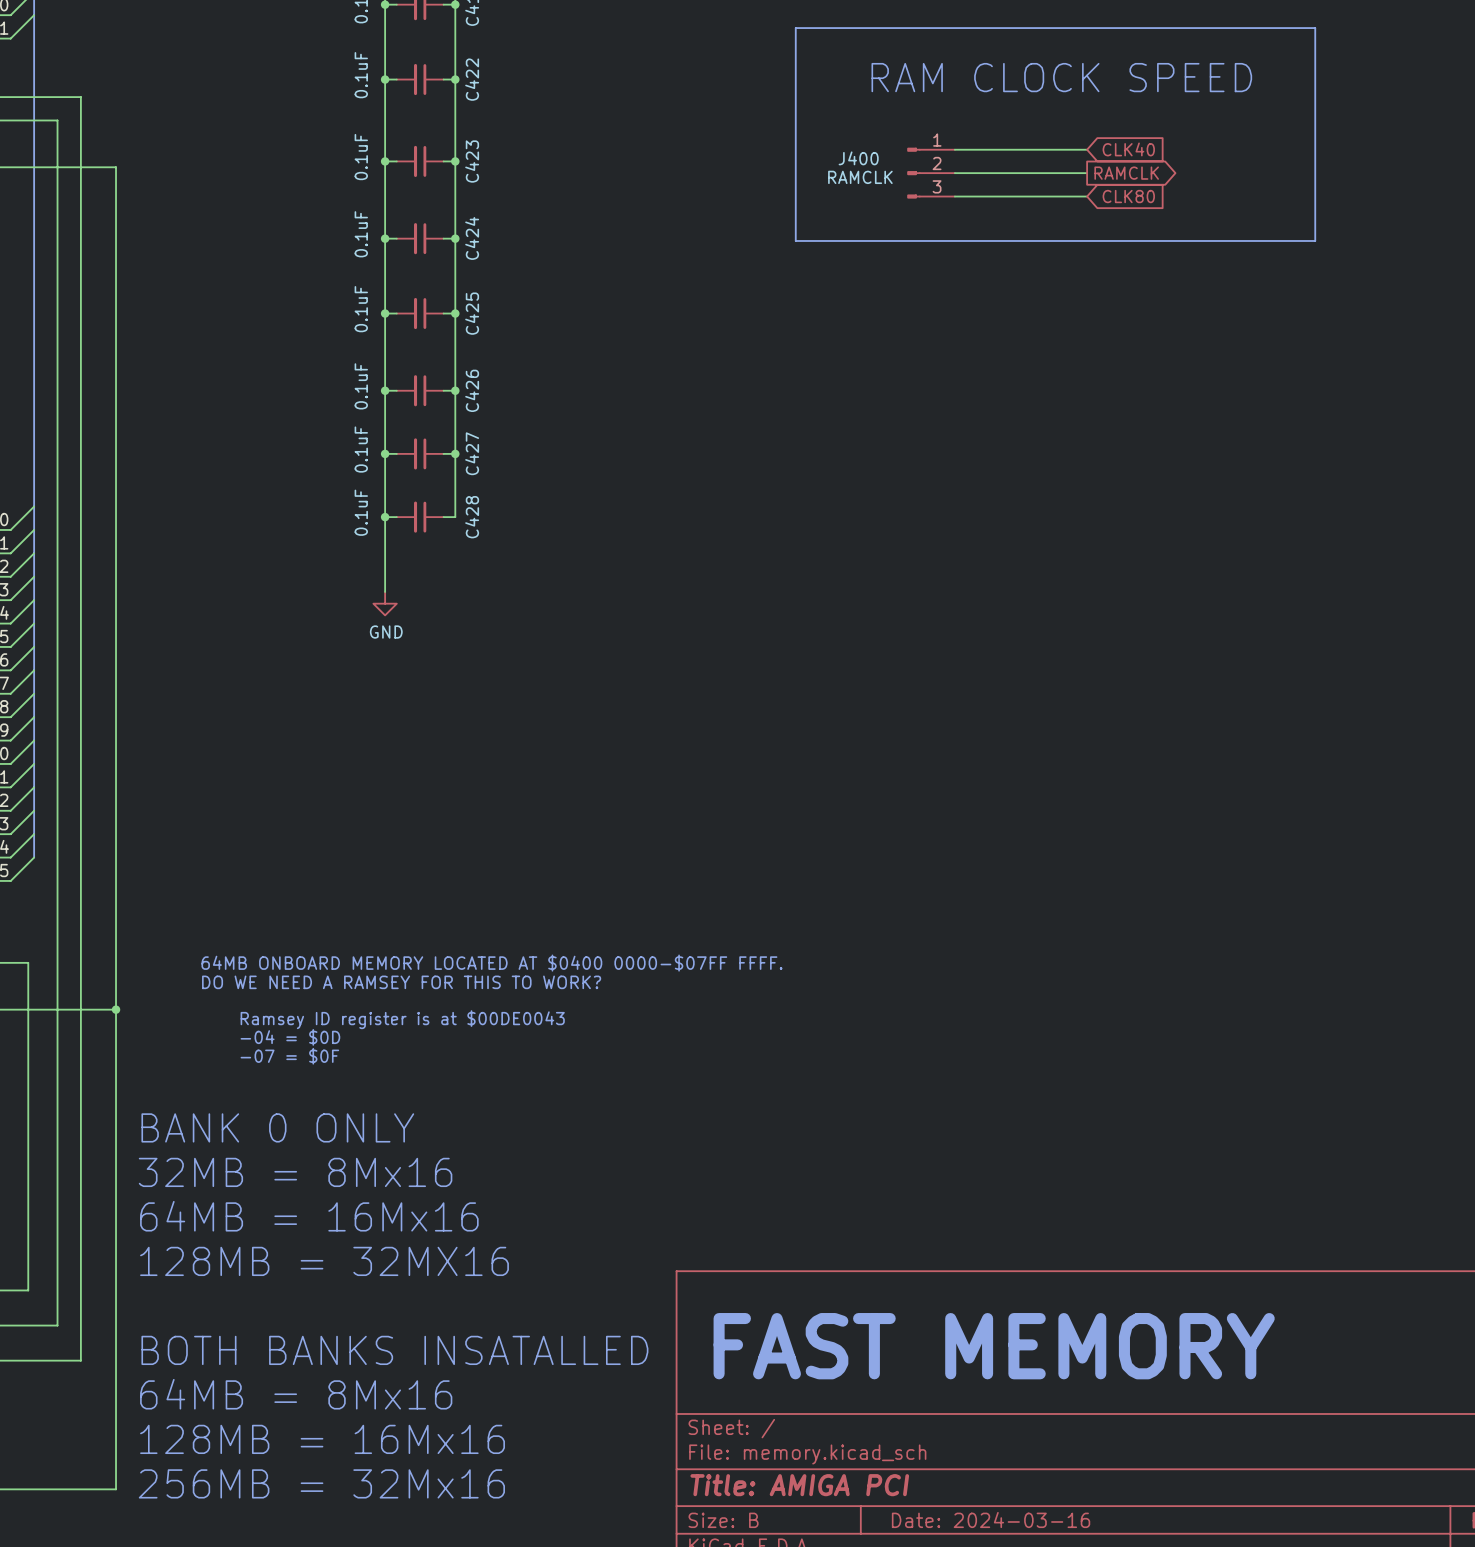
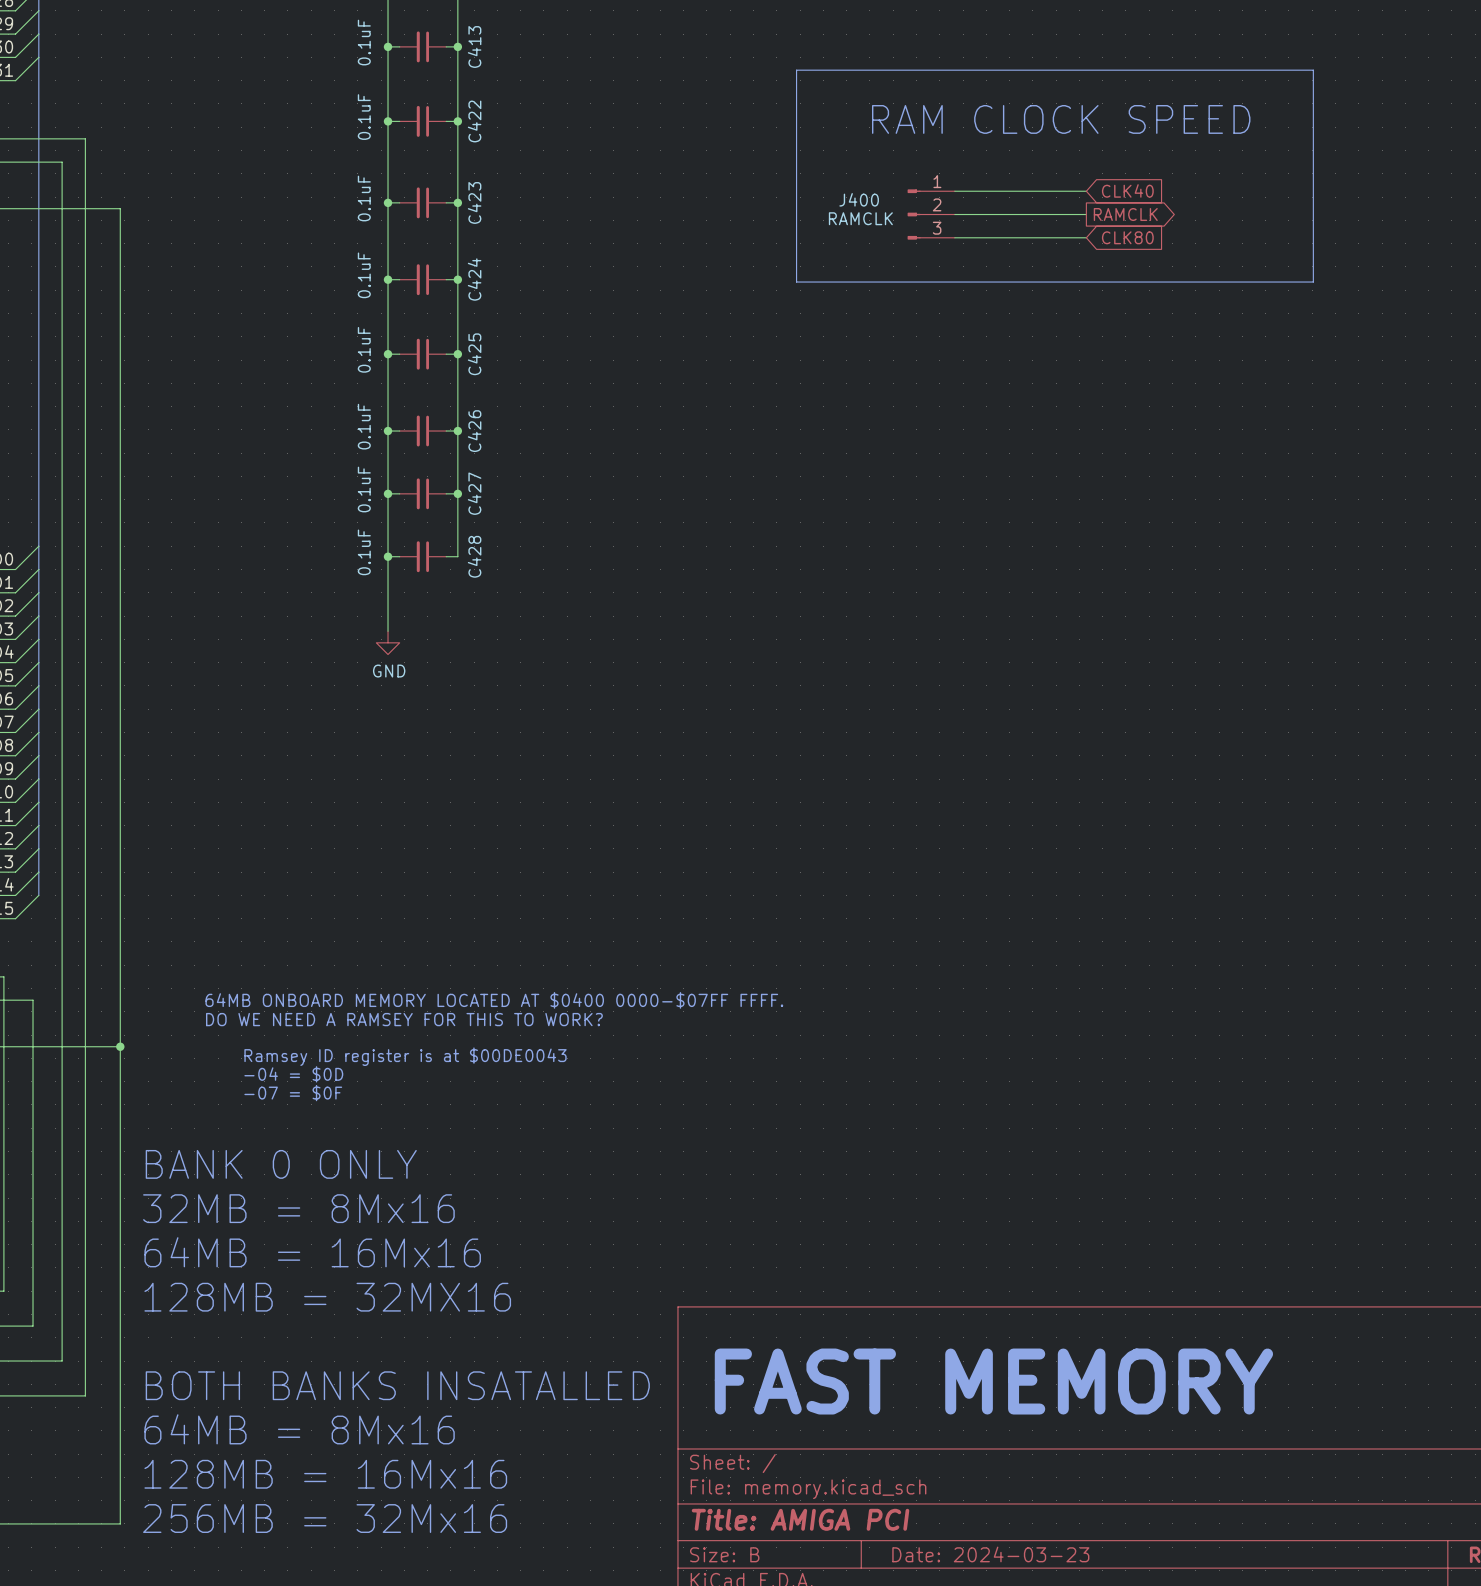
title block: Date: 2024-03-16 (991, 1520) -> Date: 2024-03-23 (990, 1554)

